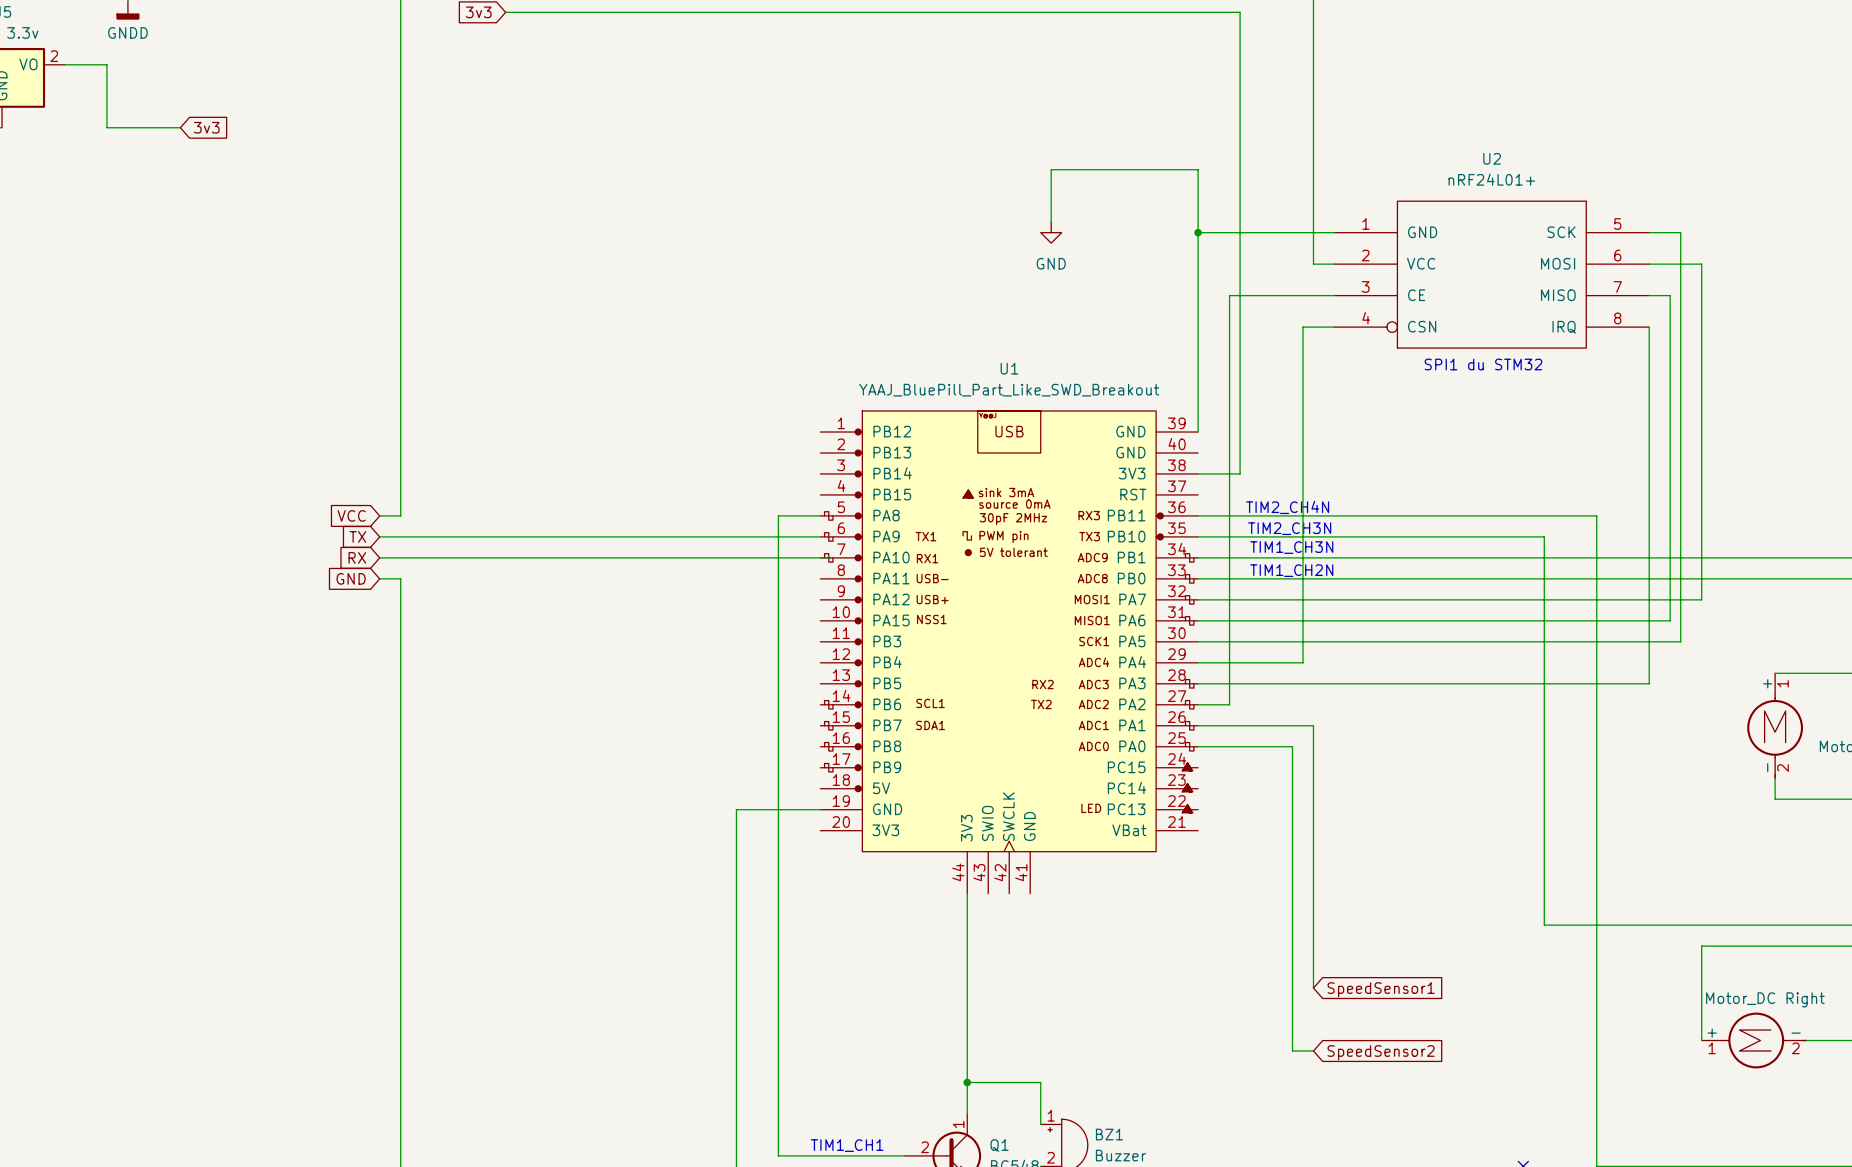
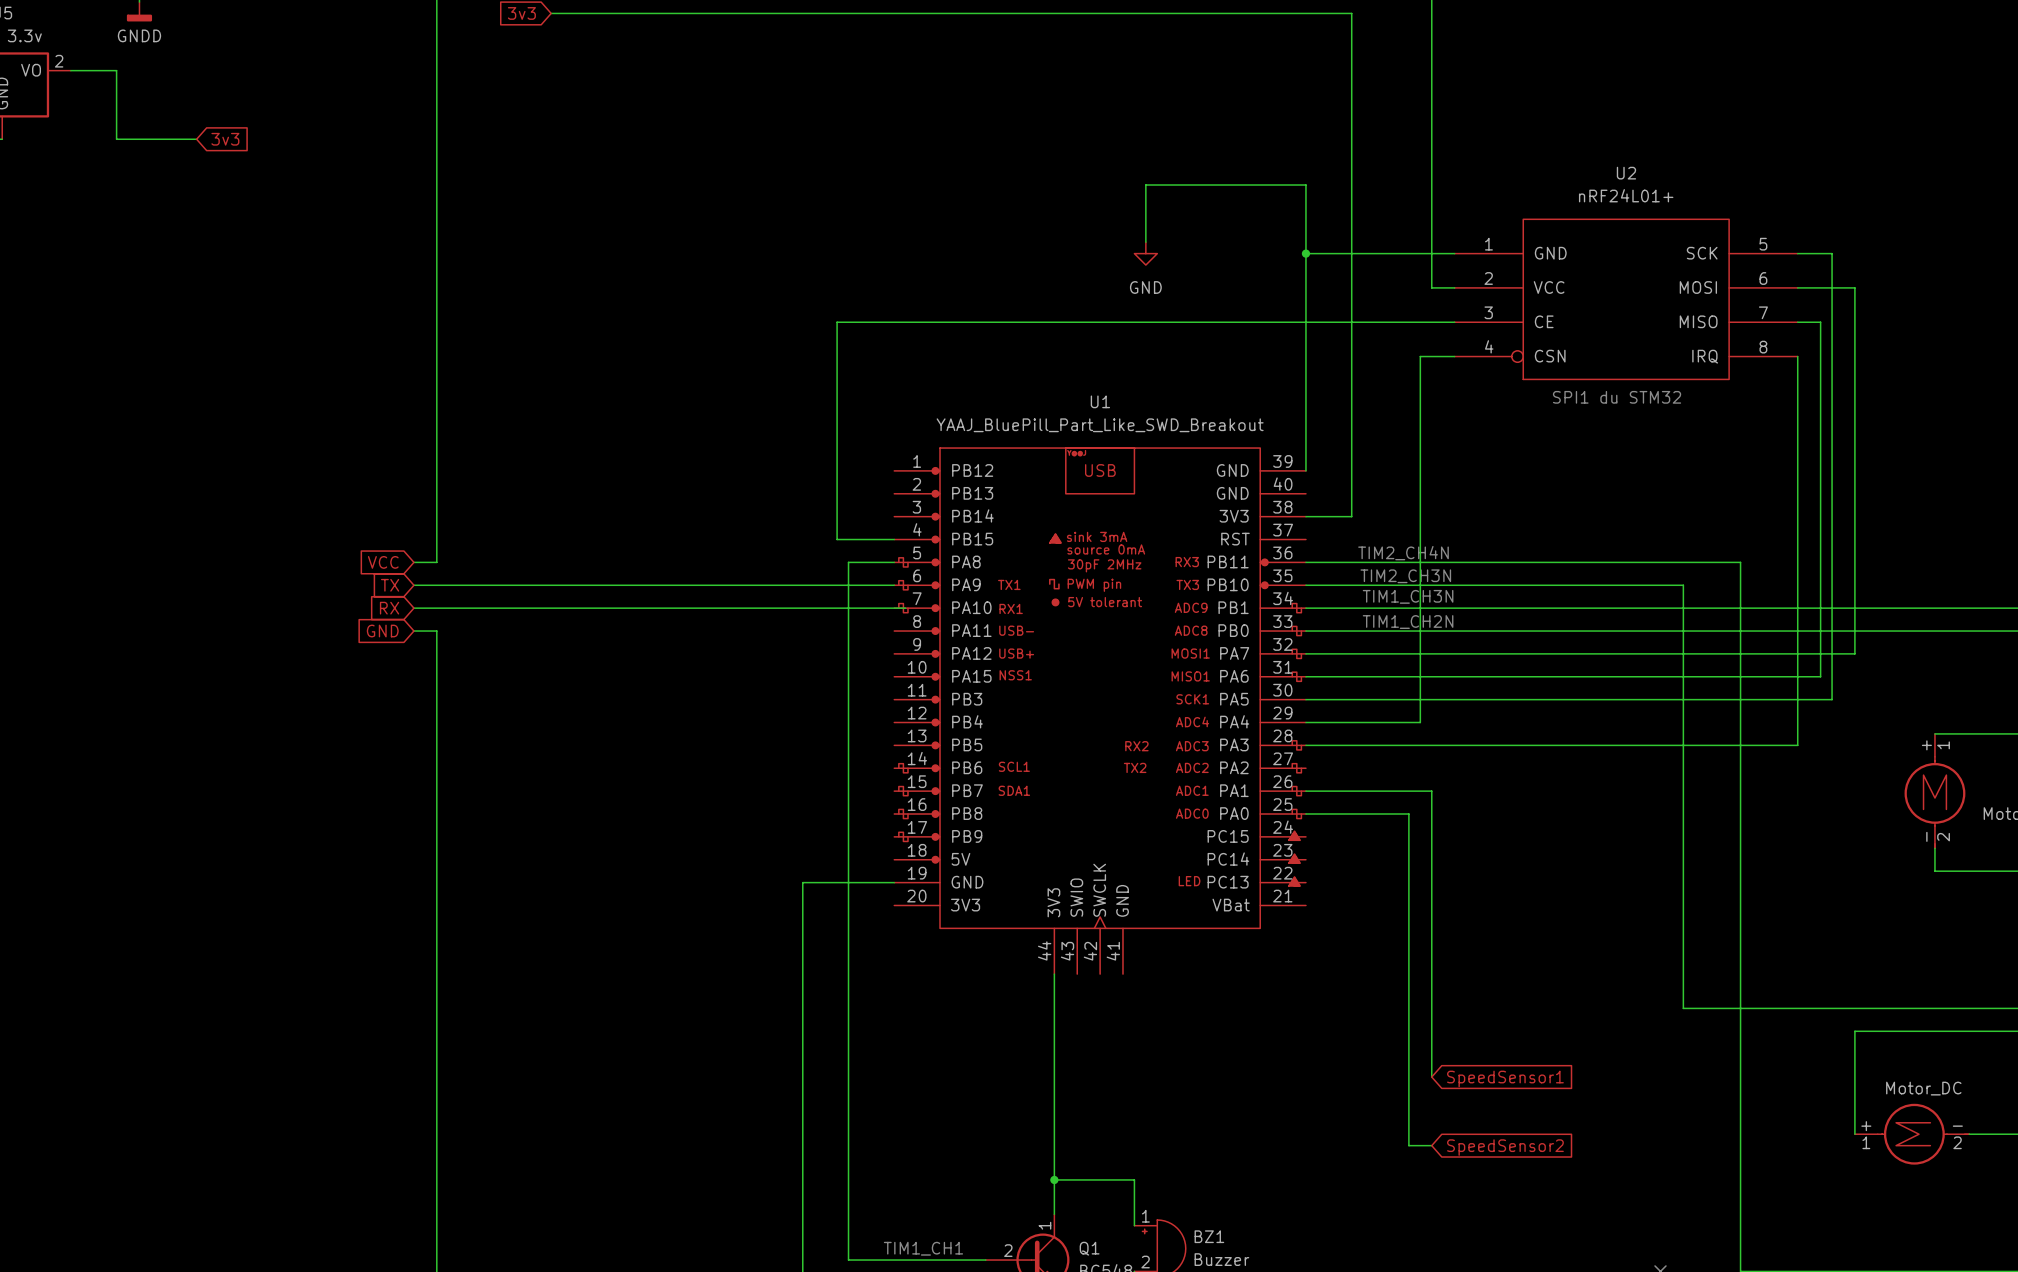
wire: (1229, 295) (1229, 704) (1198, 704) -> (1340, 322) (837, 322) (837, 539) (894, 539)
part value: Motor_DC Right (1765, 999) -> Motor_DC (1923, 1088)

